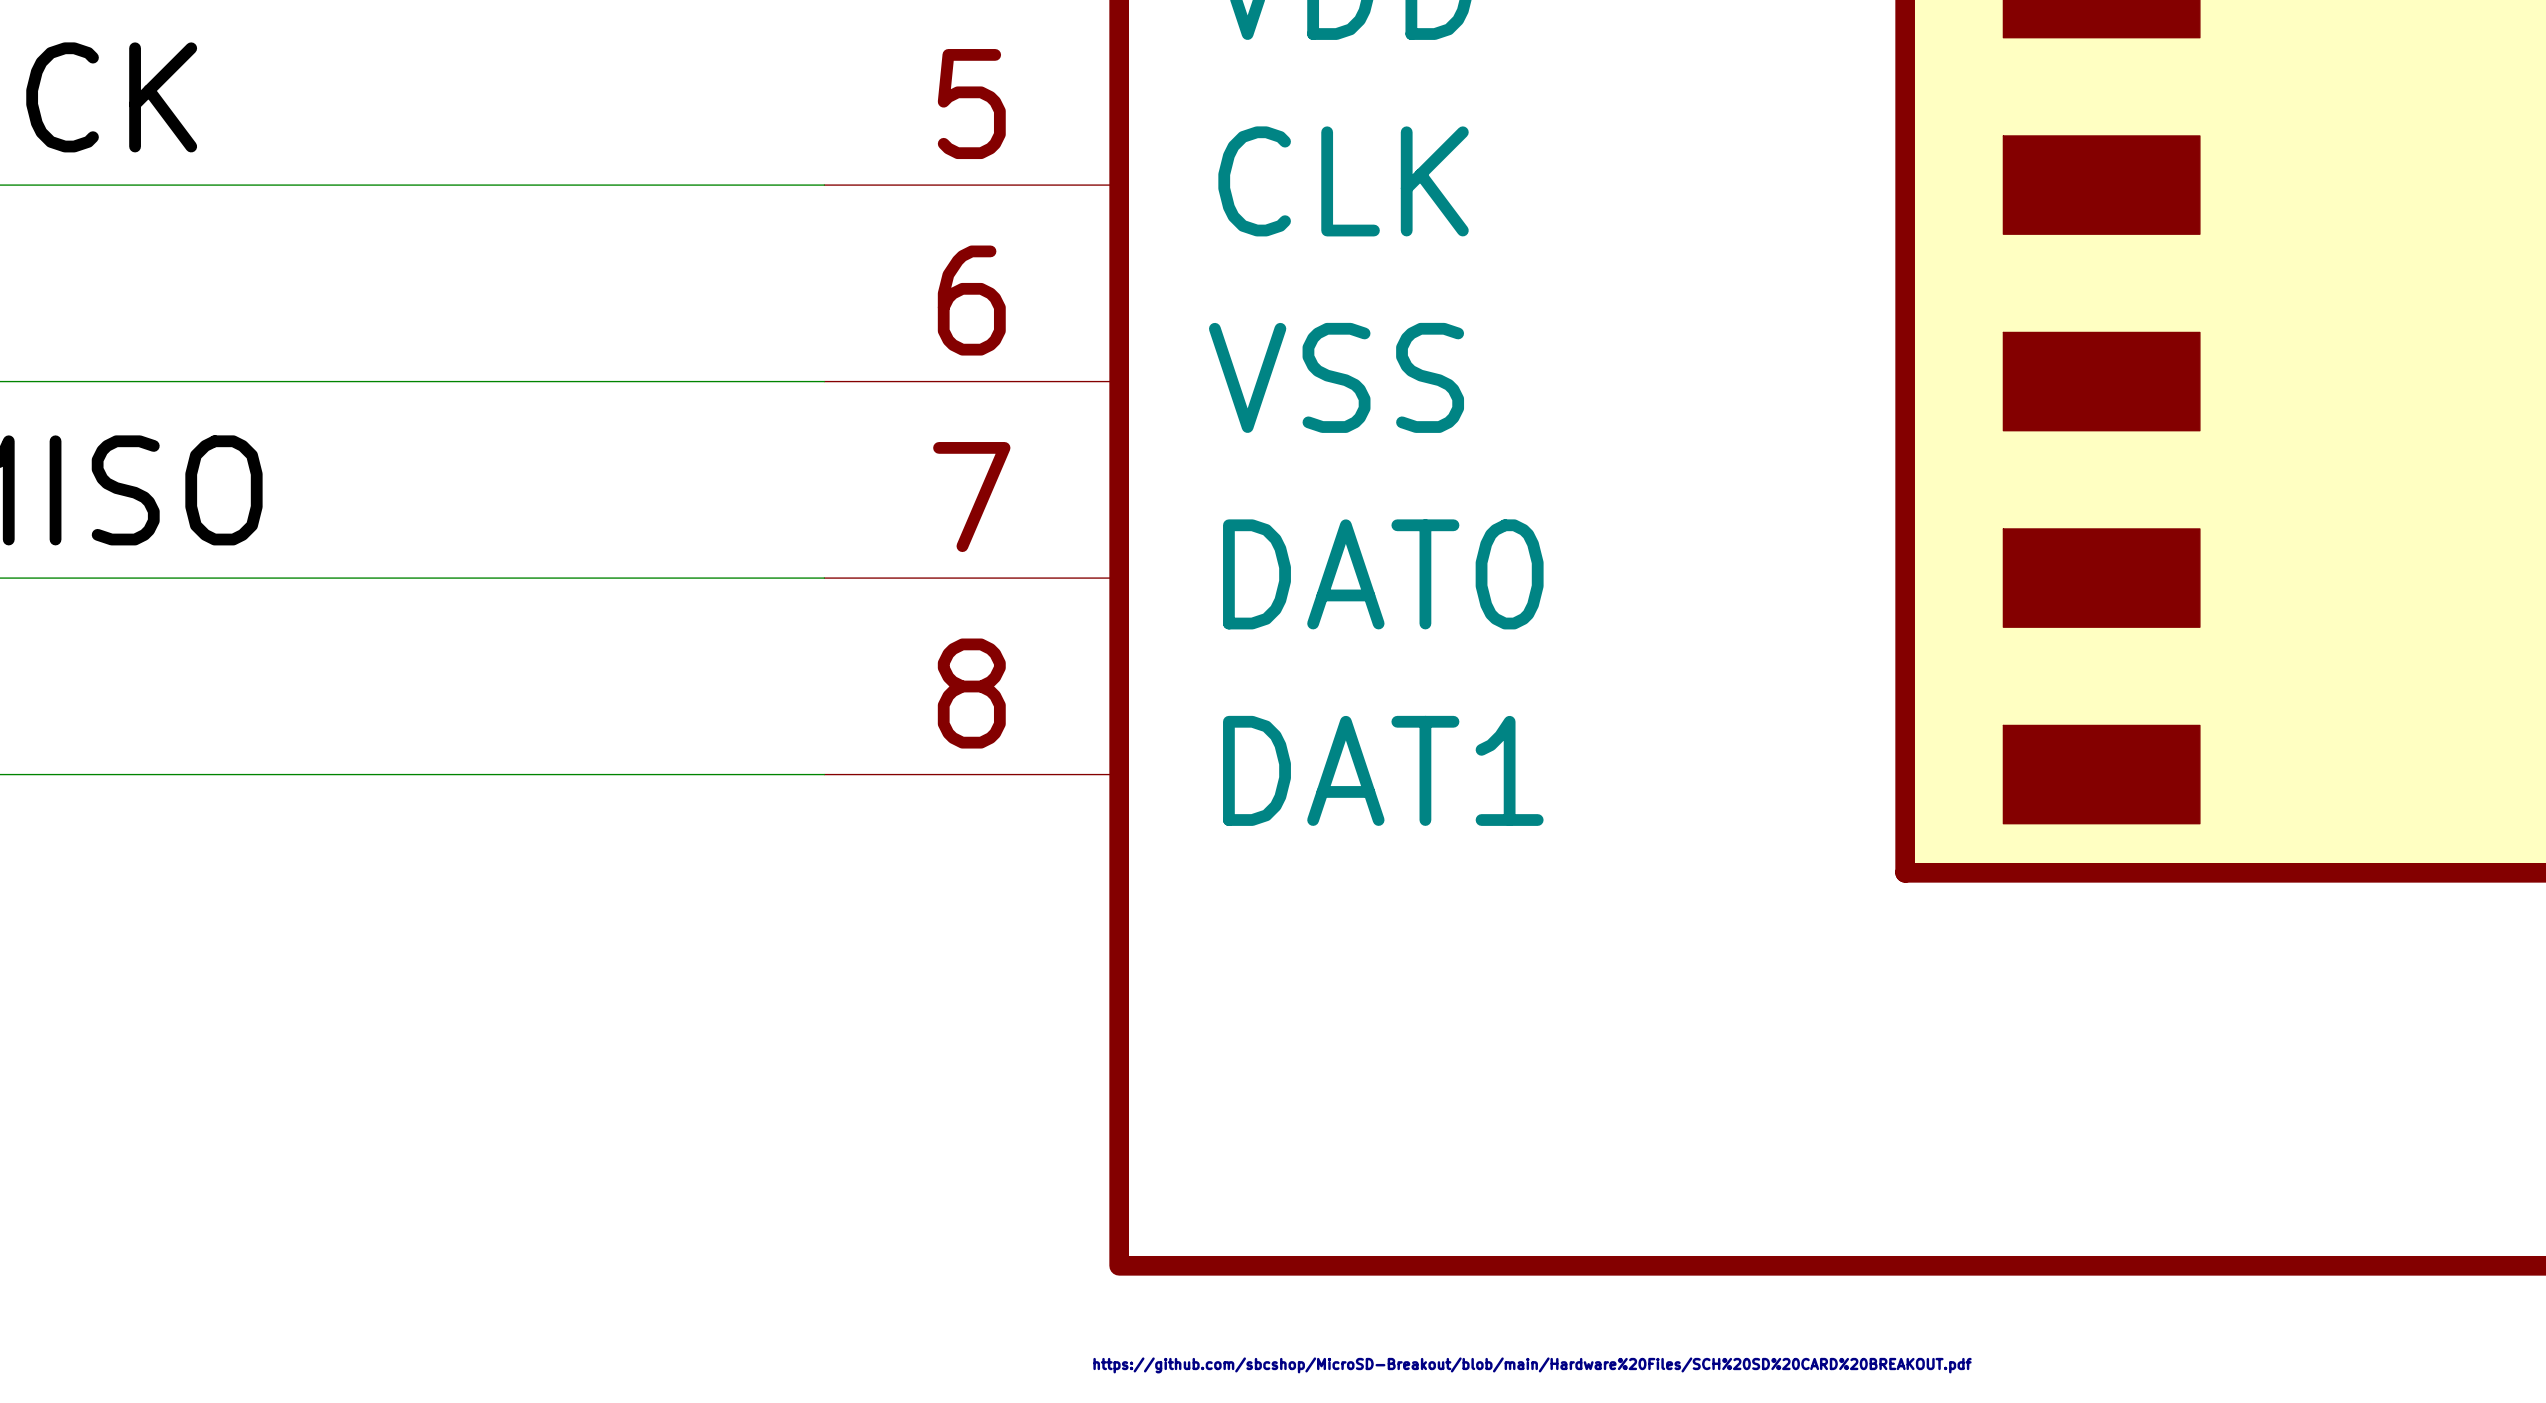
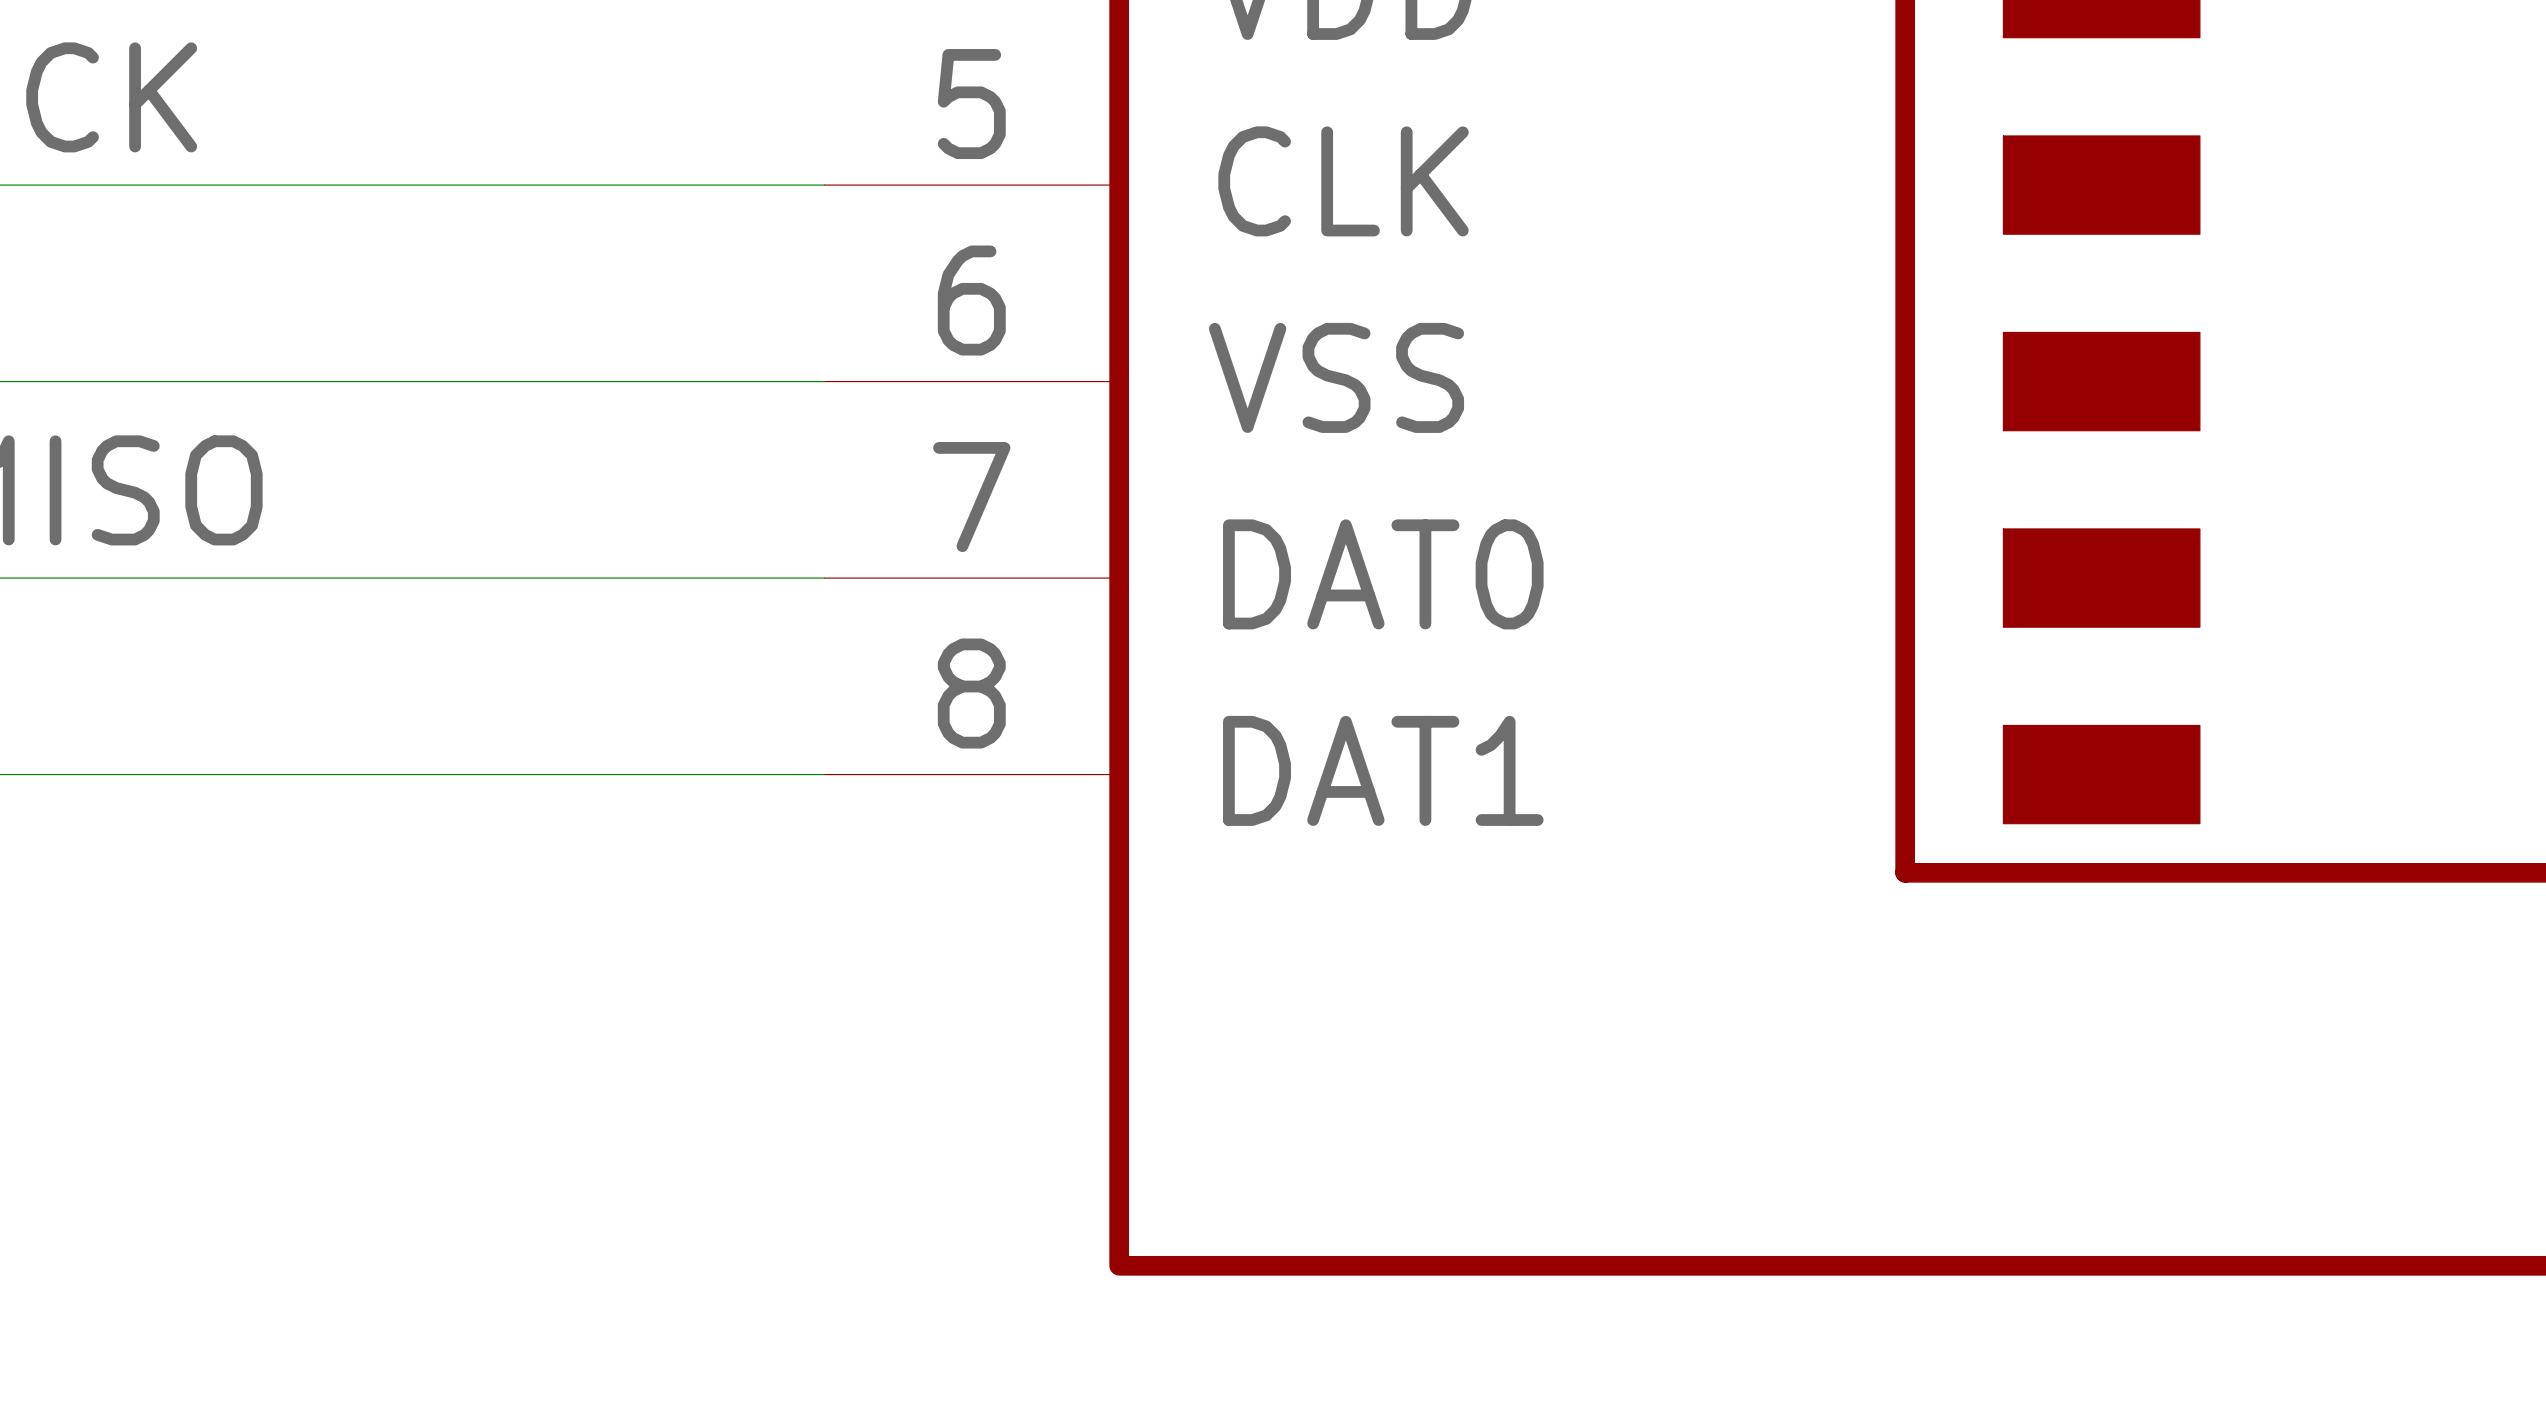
text: https://github.com/sbcshop/MicroSD-Breakout/blob/main/Hardware%20Files/SCH%20SD%20CARD%20BREAKOUT.pdf (1532, 1365) -> none

